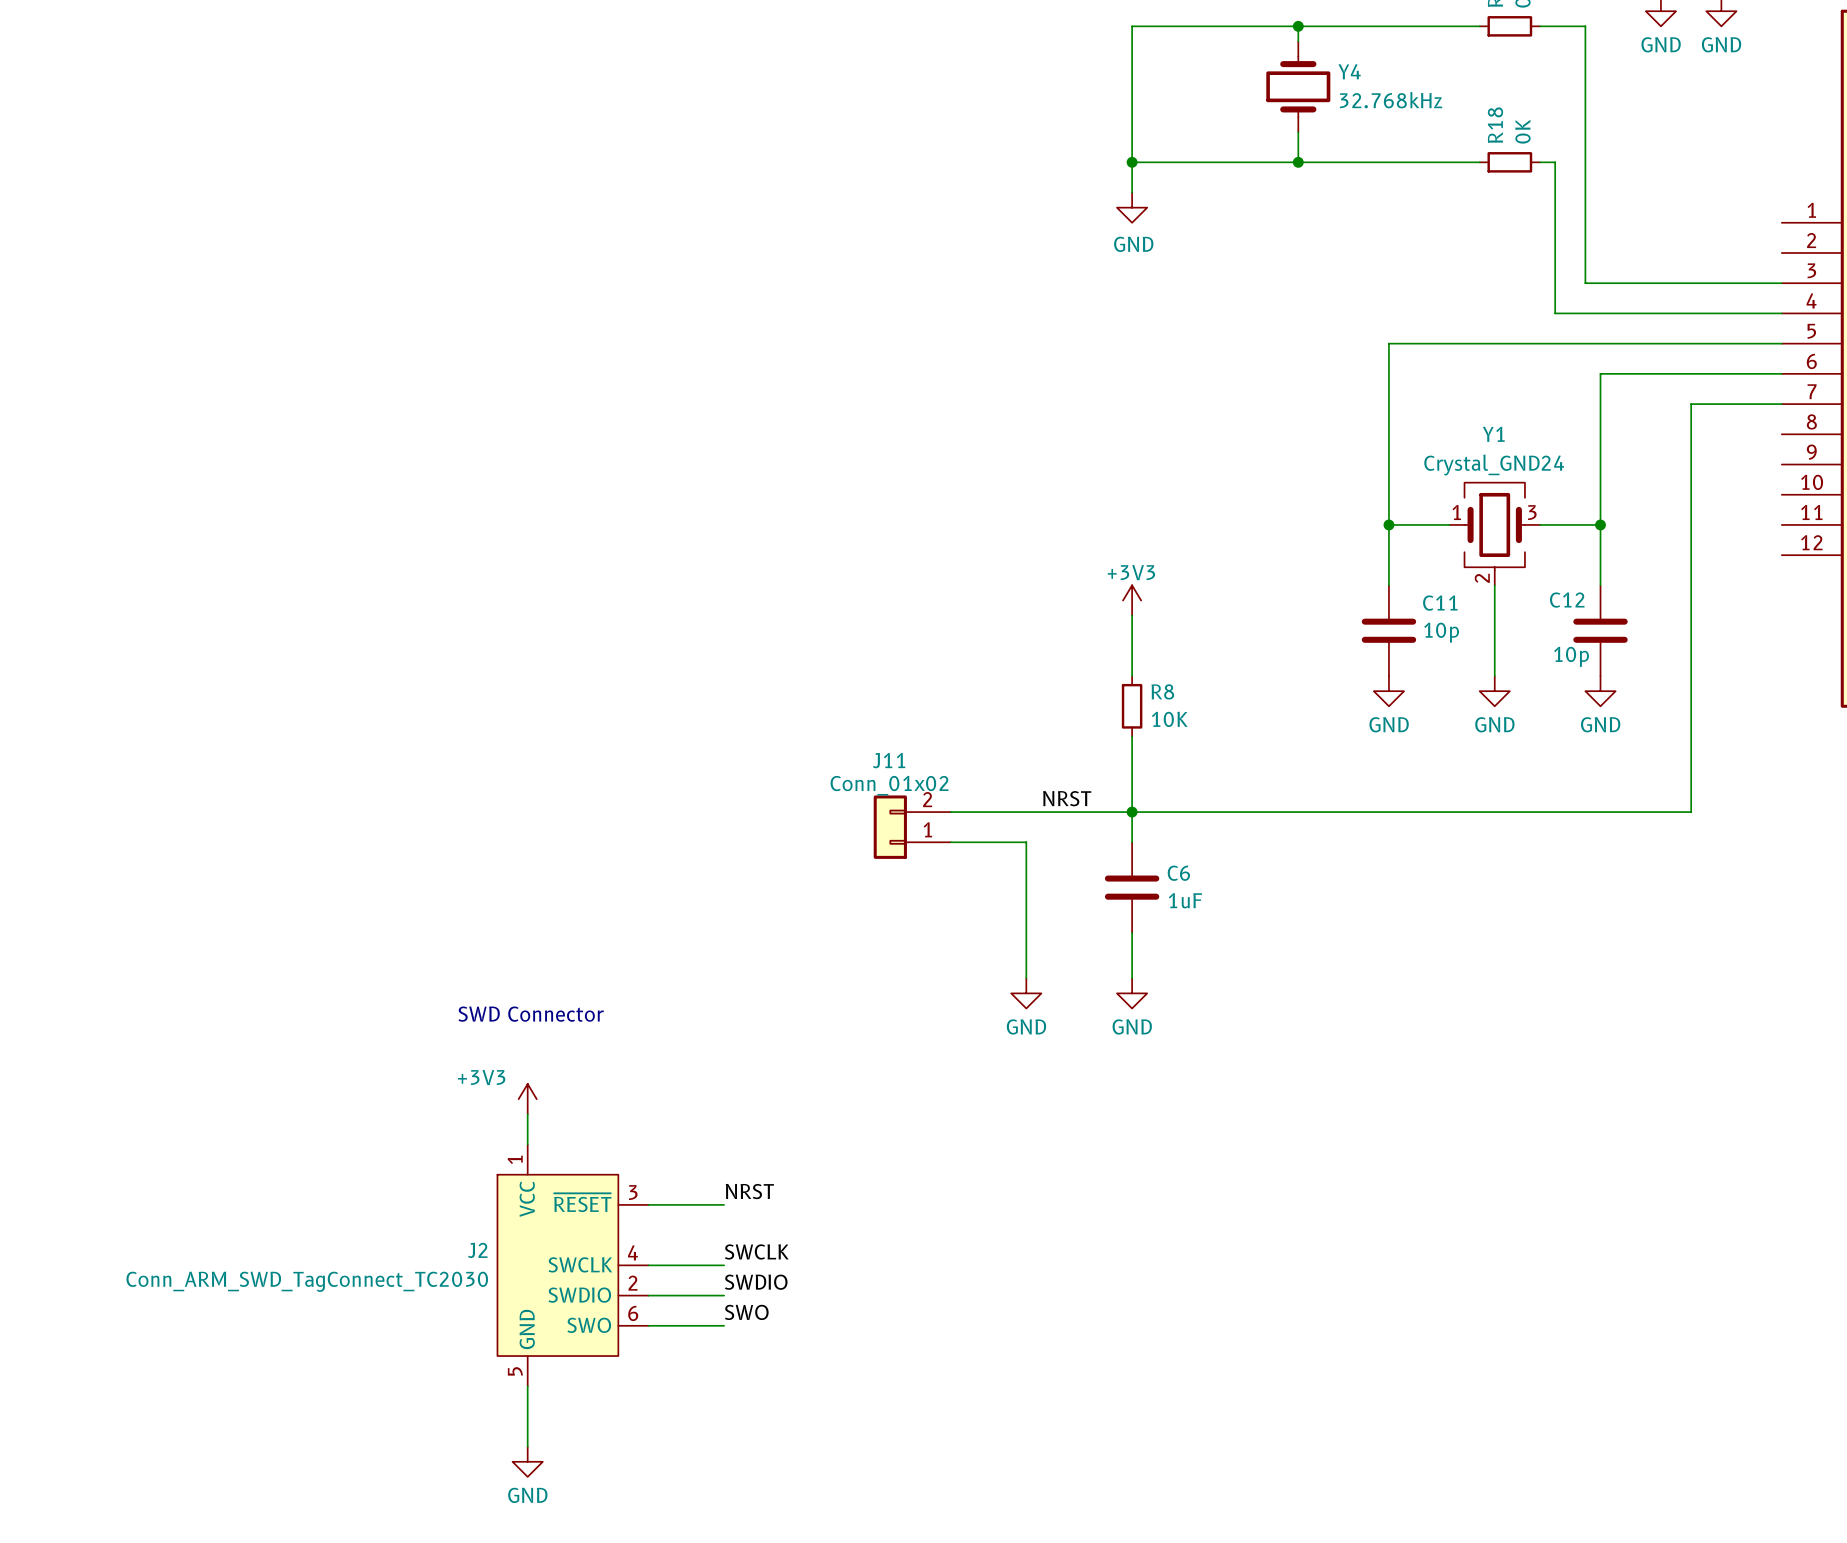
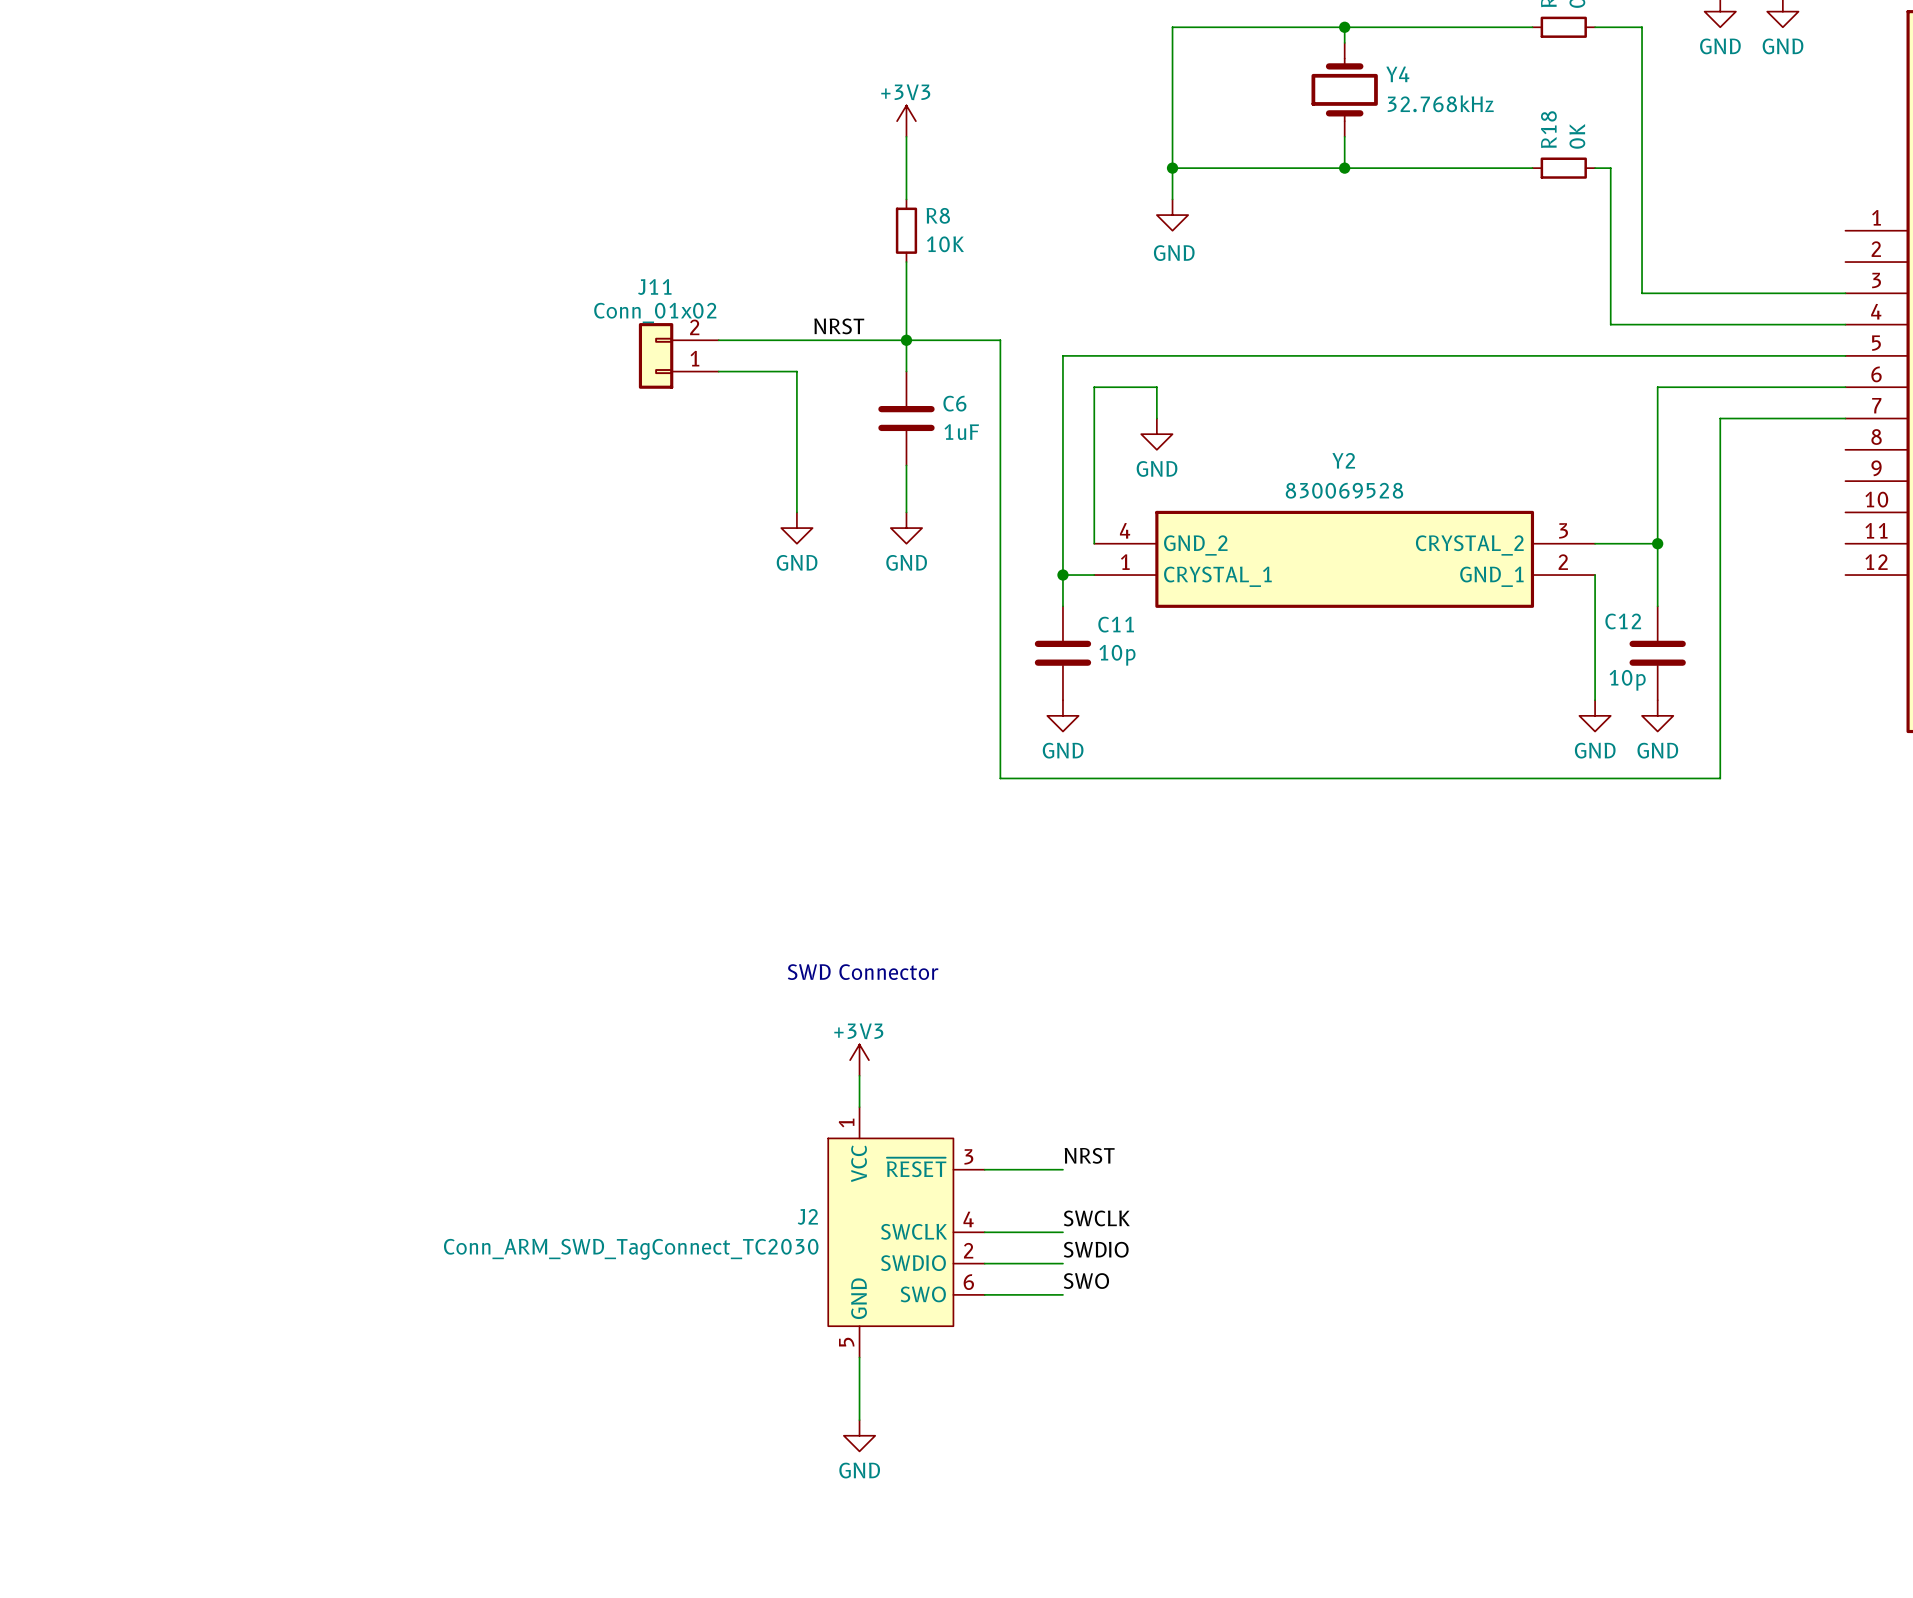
power symbol: none -> +3V3 (906, 121)
wire: none -> (906, 136) (906, 199)
wire: none -> (906, 262) (906, 371)
label: none -> NRST (839, 326)
junction: none -> (906, 340)
wire: (1388, 343) (1388, 585) -> (1438, 355) (1062, 355) (1062, 606)
wire: none -> (718, 371) (796, 371) (796, 512)
wire: none -> (1156, 418) (1156, 387) (1094, 387) (1094, 543)
wire: (1691, 404) (1691, 812) (950, 812) -> (1751, 418) (1720, 418) (1720, 778) (1000, 778) (1000, 340) (718, 340)
power symbol: none -> GND (1156, 434)
wire: none -> (906, 465) (906, 512)
power symbol: none -> GND (796, 528)
power symbol: none -> GND (906, 528)
junction: (1388, 524) -> none
Y1: Crystal_GND24 (1494, 534) -> none
Y2: none -> 830069528 (1344, 559)
wire: none -> (1062, 575) (1094, 575)
junction: none -> (1062, 575)
wire: none -> (1595, 575) (1595, 700)
wire: (1494, 585) (1494, 676) -> none
power symbol: +3V3 (1132, 600) -> none
wire: (1132, 615) (1132, 676) -> none
C11 position: (1388, 630) -> (1062, 653)
power symbol: none -> GND (1062, 715)
power symbol: GND (1388, 691) -> none
power symbol position: GND (1494, 691) -> GND (1595, 715)
R8 position: (1132, 706) -> (906, 230)
wire: (1132, 736) (1132, 842) -> none
label: NRST (1067, 798) -> none
junction: (1132, 812) -> none
J11 position: (912, 827) -> (678, 355)
wire: (950, 842) (1026, 842) (1026, 978) -> none
C6 position: (1132, 887) -> (906, 418)
wire: (1132, 932) (1132, 978) -> none
text: none -> SWD Connector (863, 972)
power symbol: GND (1026, 993) -> none
power symbol: GND (1132, 993) -> none
text: SWD Connector (531, 1014) -> none
power symbol: none -> +3V3 (859, 1060)
wire: none -> (859, 1075) (859, 1107)
power symbol: +3V3 (527, 1099) -> none
wire: (527, 1114) (527, 1144) -> none
label: none -> NRST (1089, 1155)
wire: none -> (984, 1169) (1062, 1169)
label: none -> SWCLK (1096, 1218)
wire: none -> (984, 1232) (1062, 1232)
label: NRST (749, 1191) -> none
wire: (648, 1204) (724, 1204) -> none
label: none -> SWDIO (1096, 1249)
wire: none -> (984, 1263) (1062, 1263)
label: none -> SWO (1086, 1281)
wire: none -> (984, 1294) (1062, 1294)
label: SWCLK (756, 1251) -> none
J2 position: (573, 1265) -> (906, 1232)
wire: (648, 1265) (724, 1265) -> none
label: SWDIO (756, 1282) -> none
wire: (648, 1295) (724, 1295) -> none
wire: none -> (859, 1357) (859, 1420)
label: SWO (746, 1312) -> none
wire: (648, 1325) (724, 1325) -> none
wire: (527, 1386) (527, 1446) -> none
power symbol: none -> GND (859, 1435)
power symbol: GND (527, 1461) -> none

